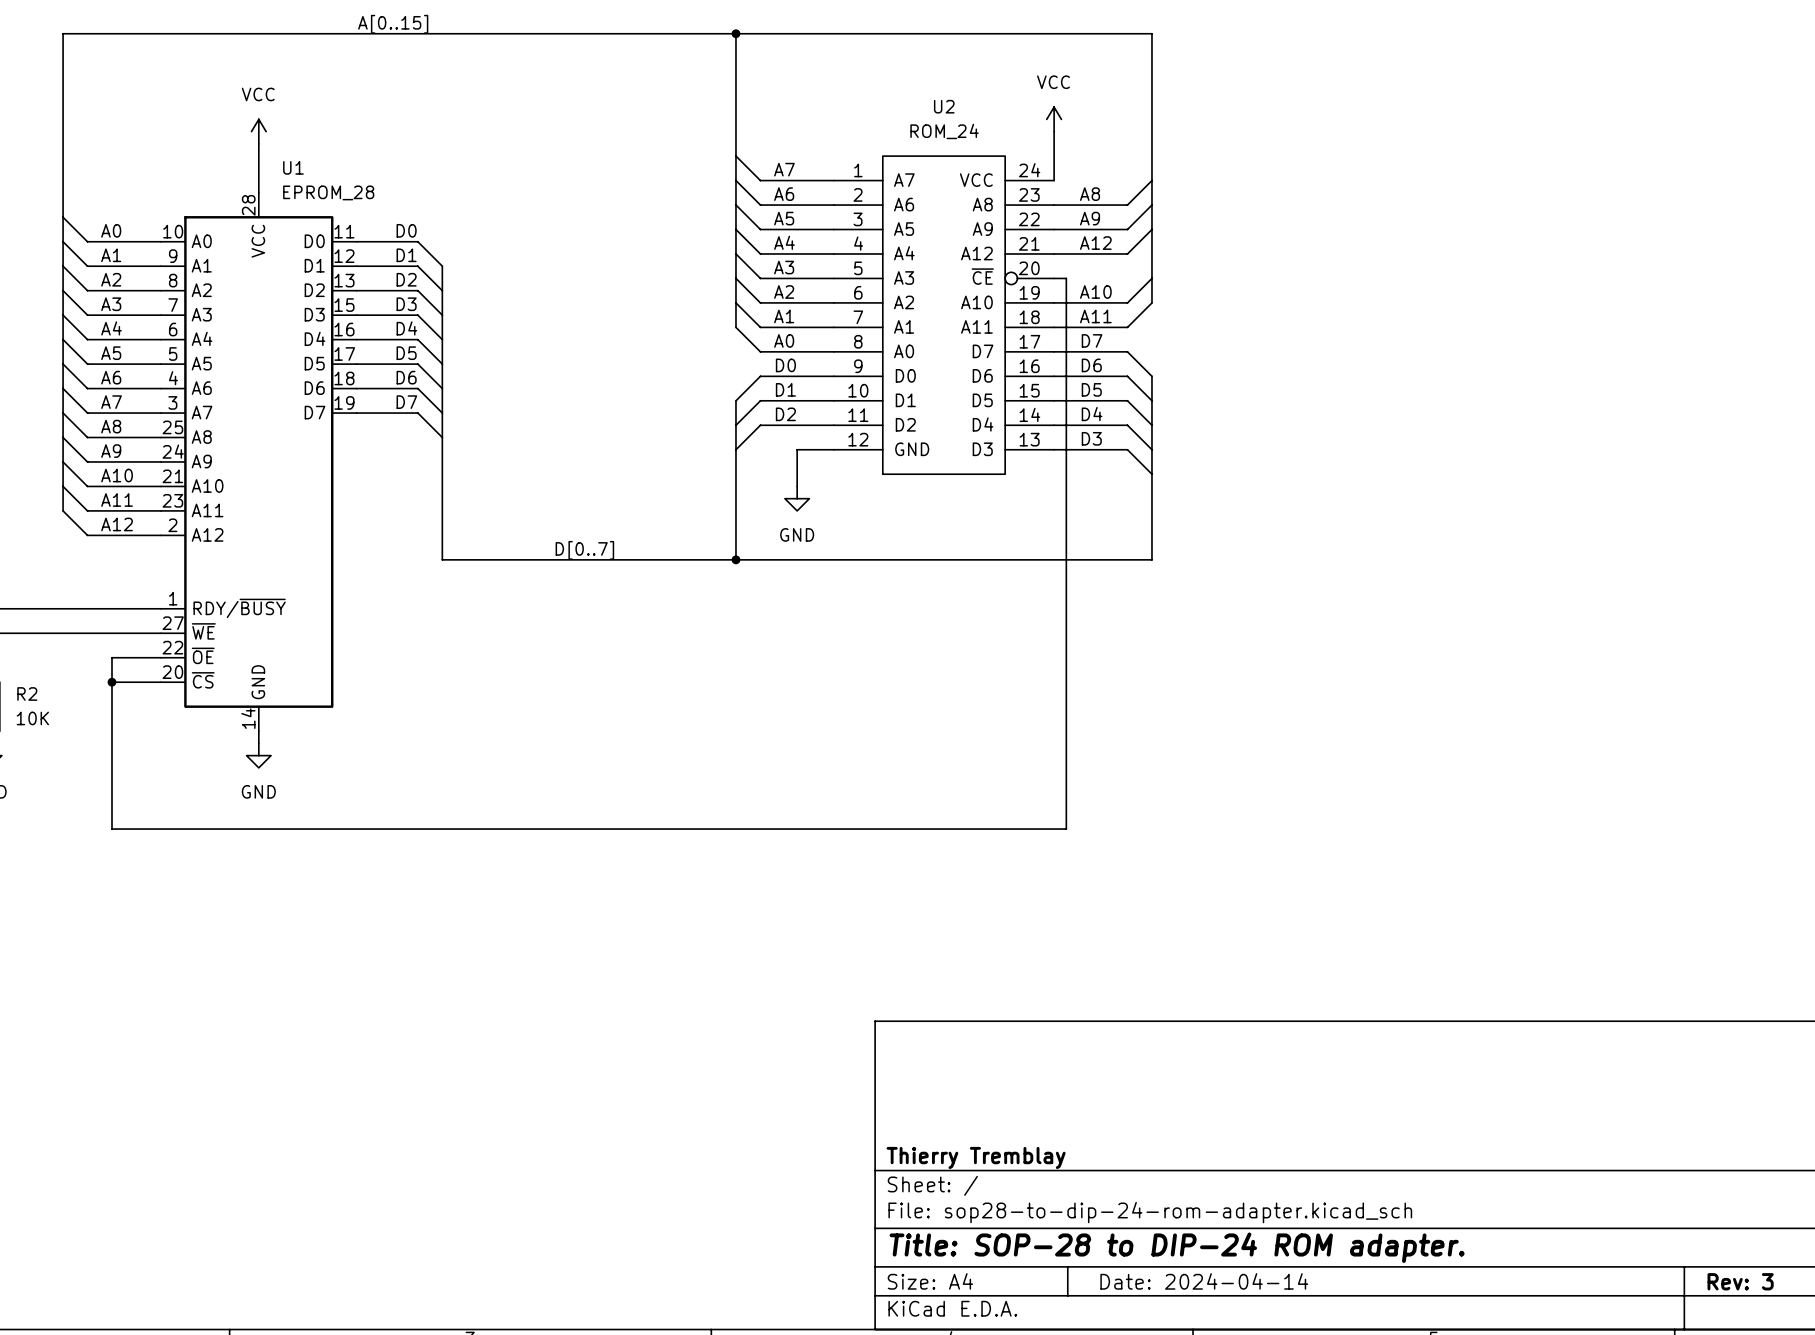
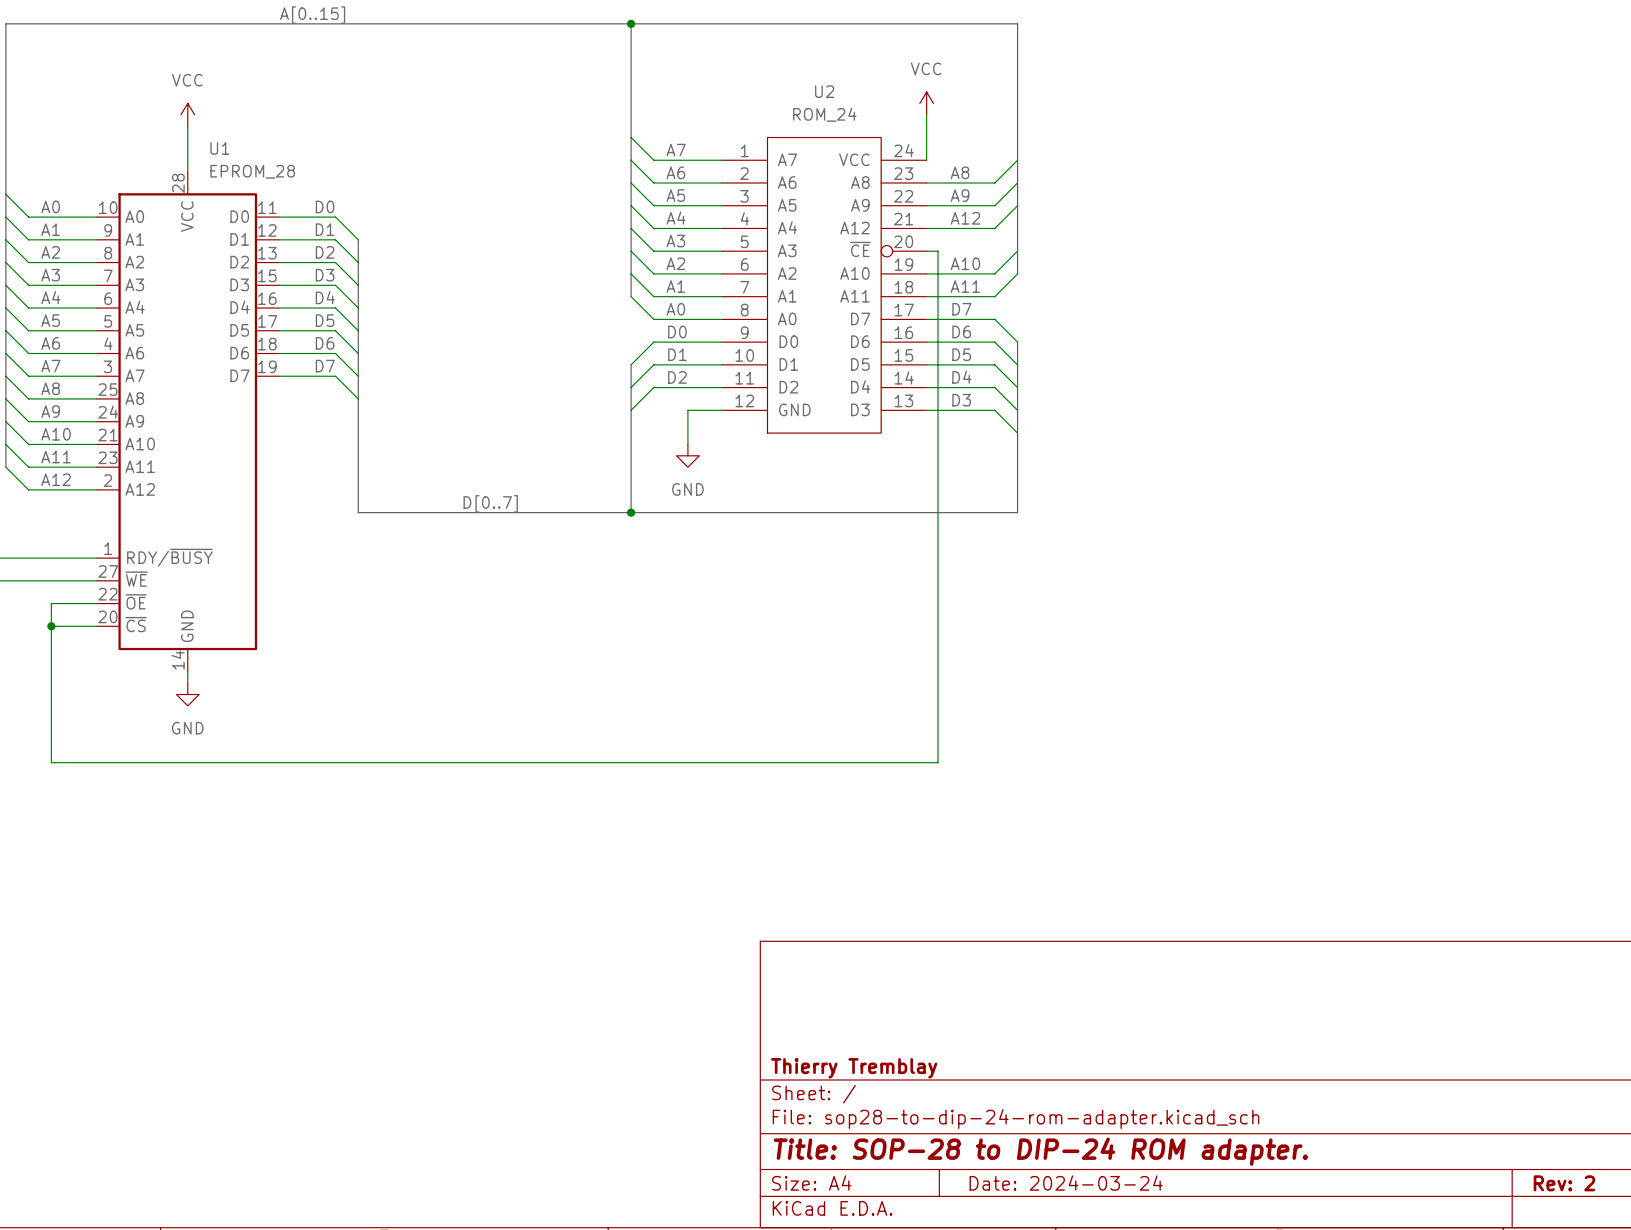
title block: Date: 2024-04-14 (1204, 1281) -> Date: 2024-03-24 (1066, 1183)
title block: Rev: 3 (1740, 1281) -> Rev: 2 (1564, 1183)

